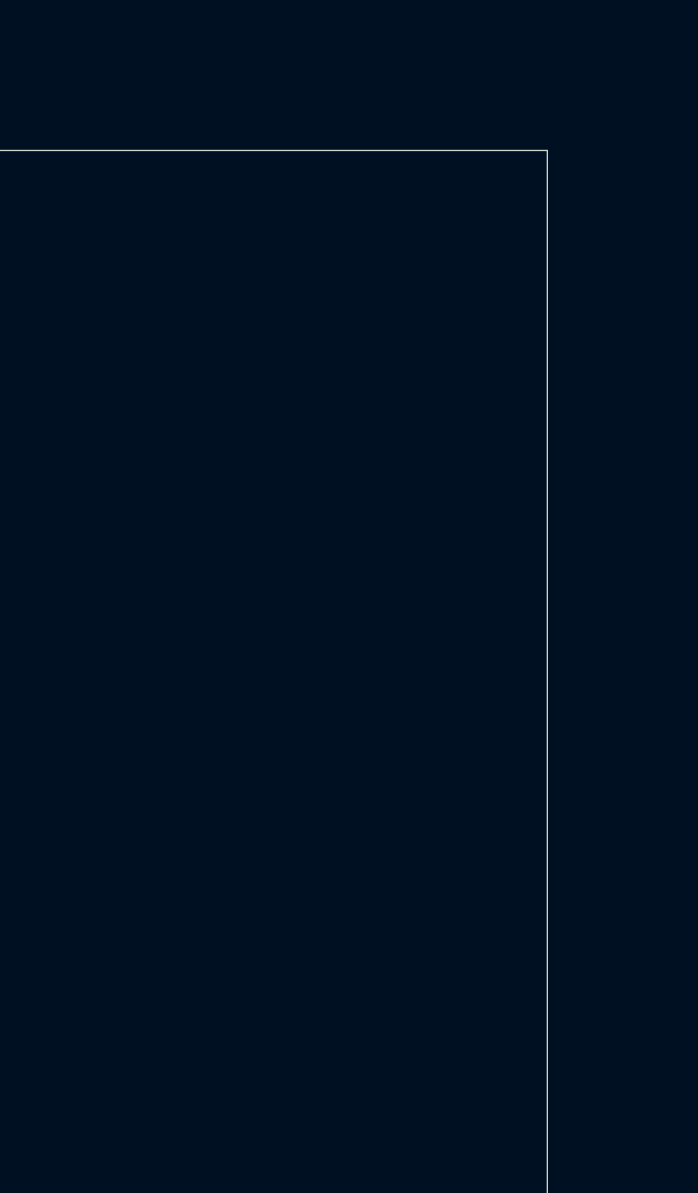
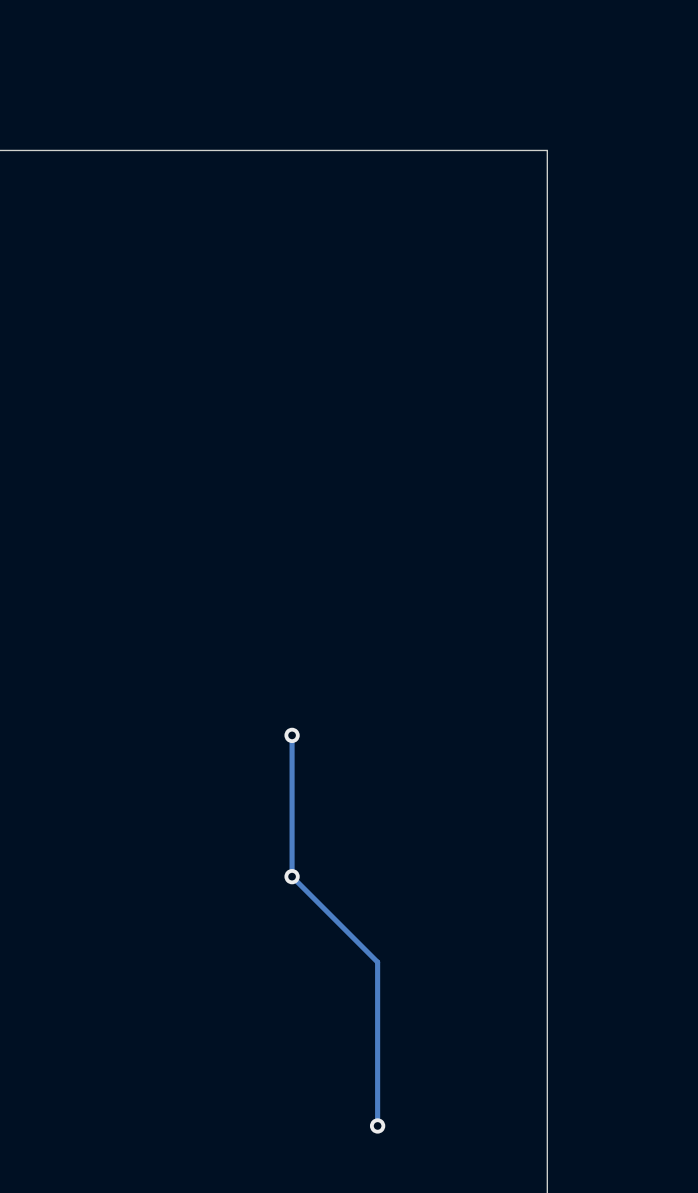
track: none -> (292, 735) (292, 876) (377, 962) (377, 1125)
via: none -> (292, 735)
via: none -> (292, 876)
via: none -> (377, 1125)

